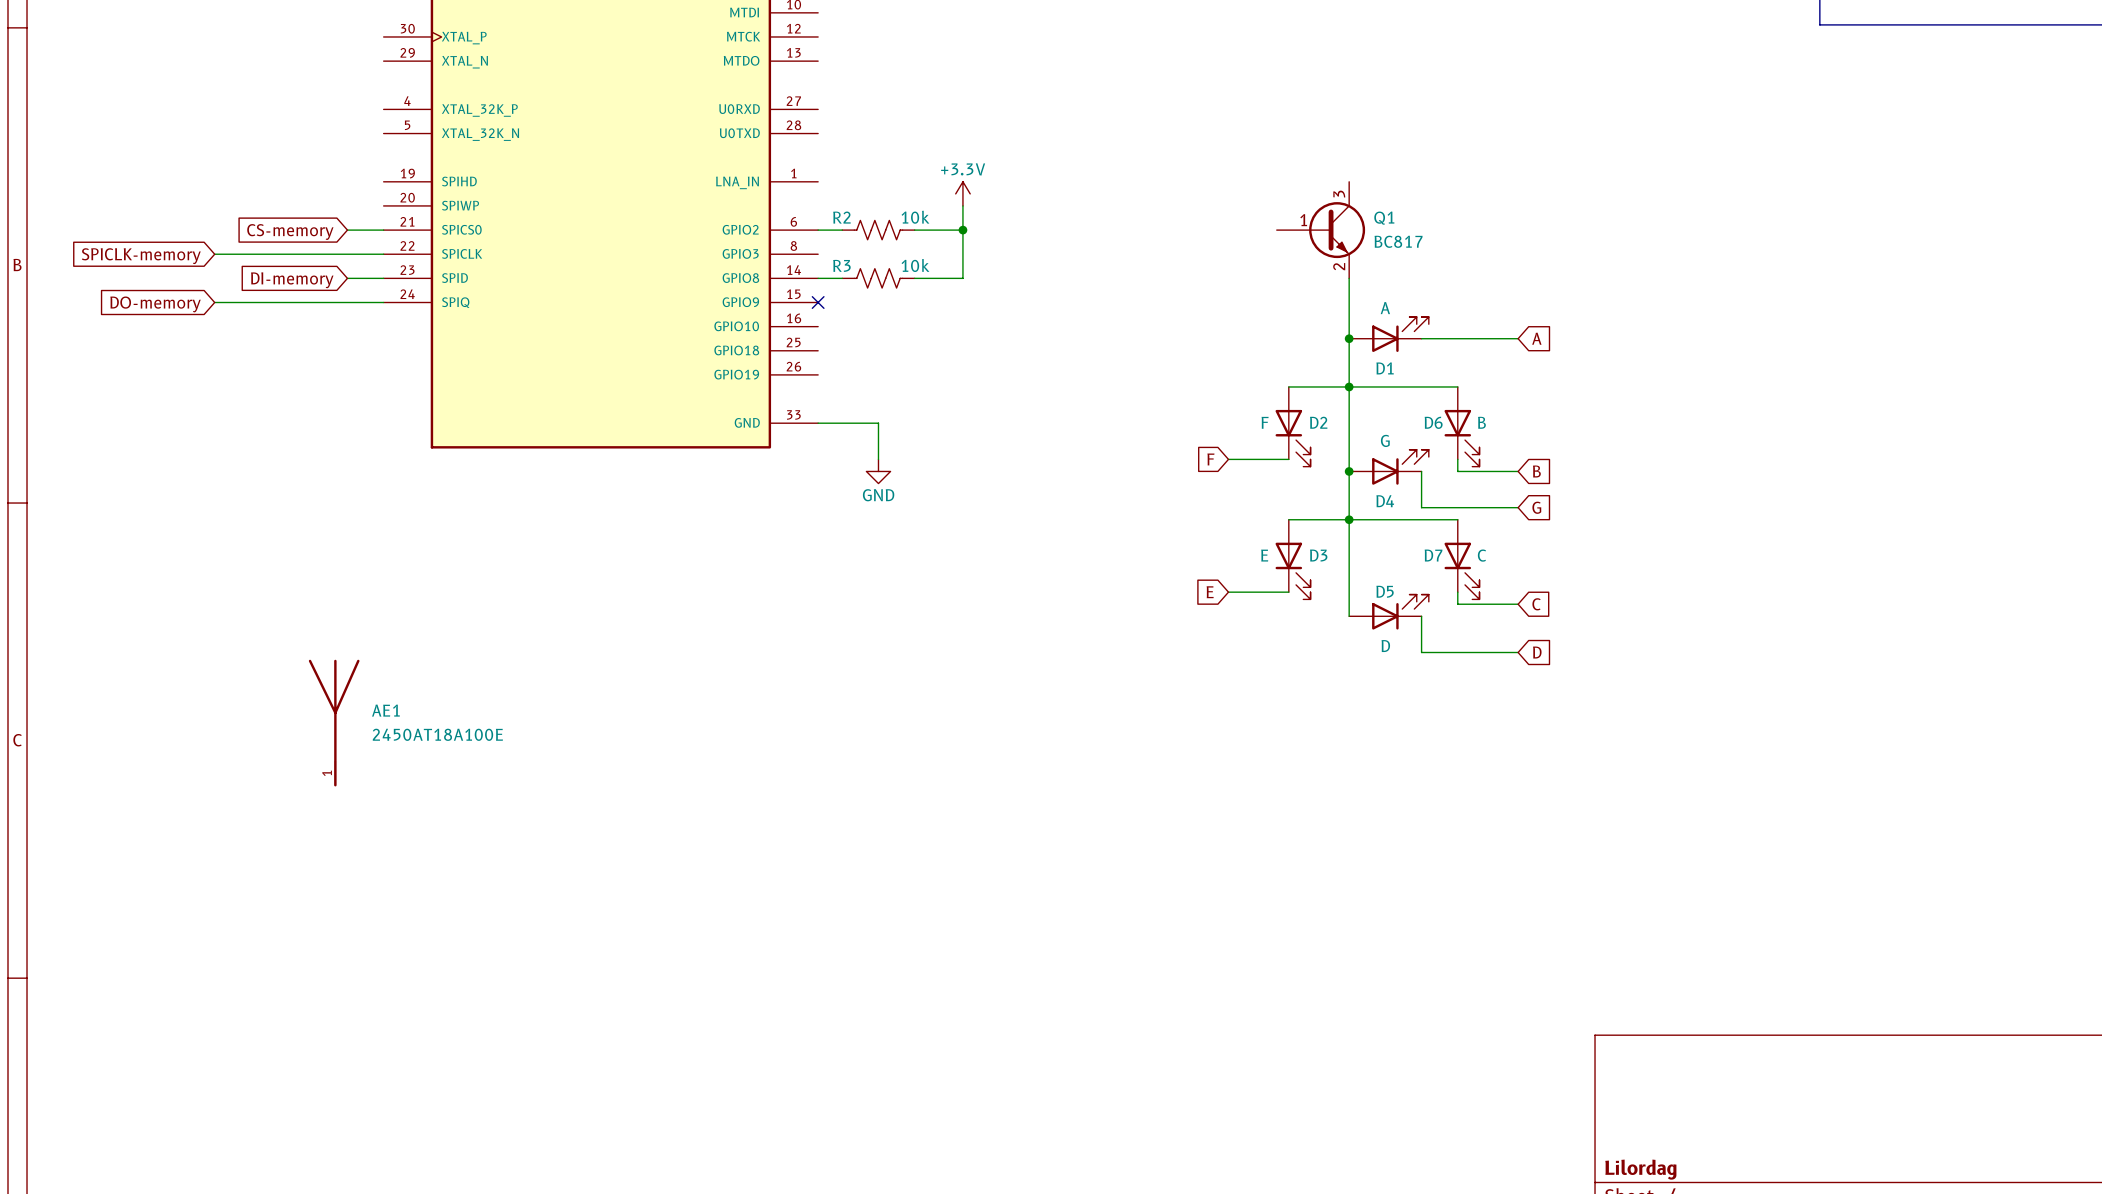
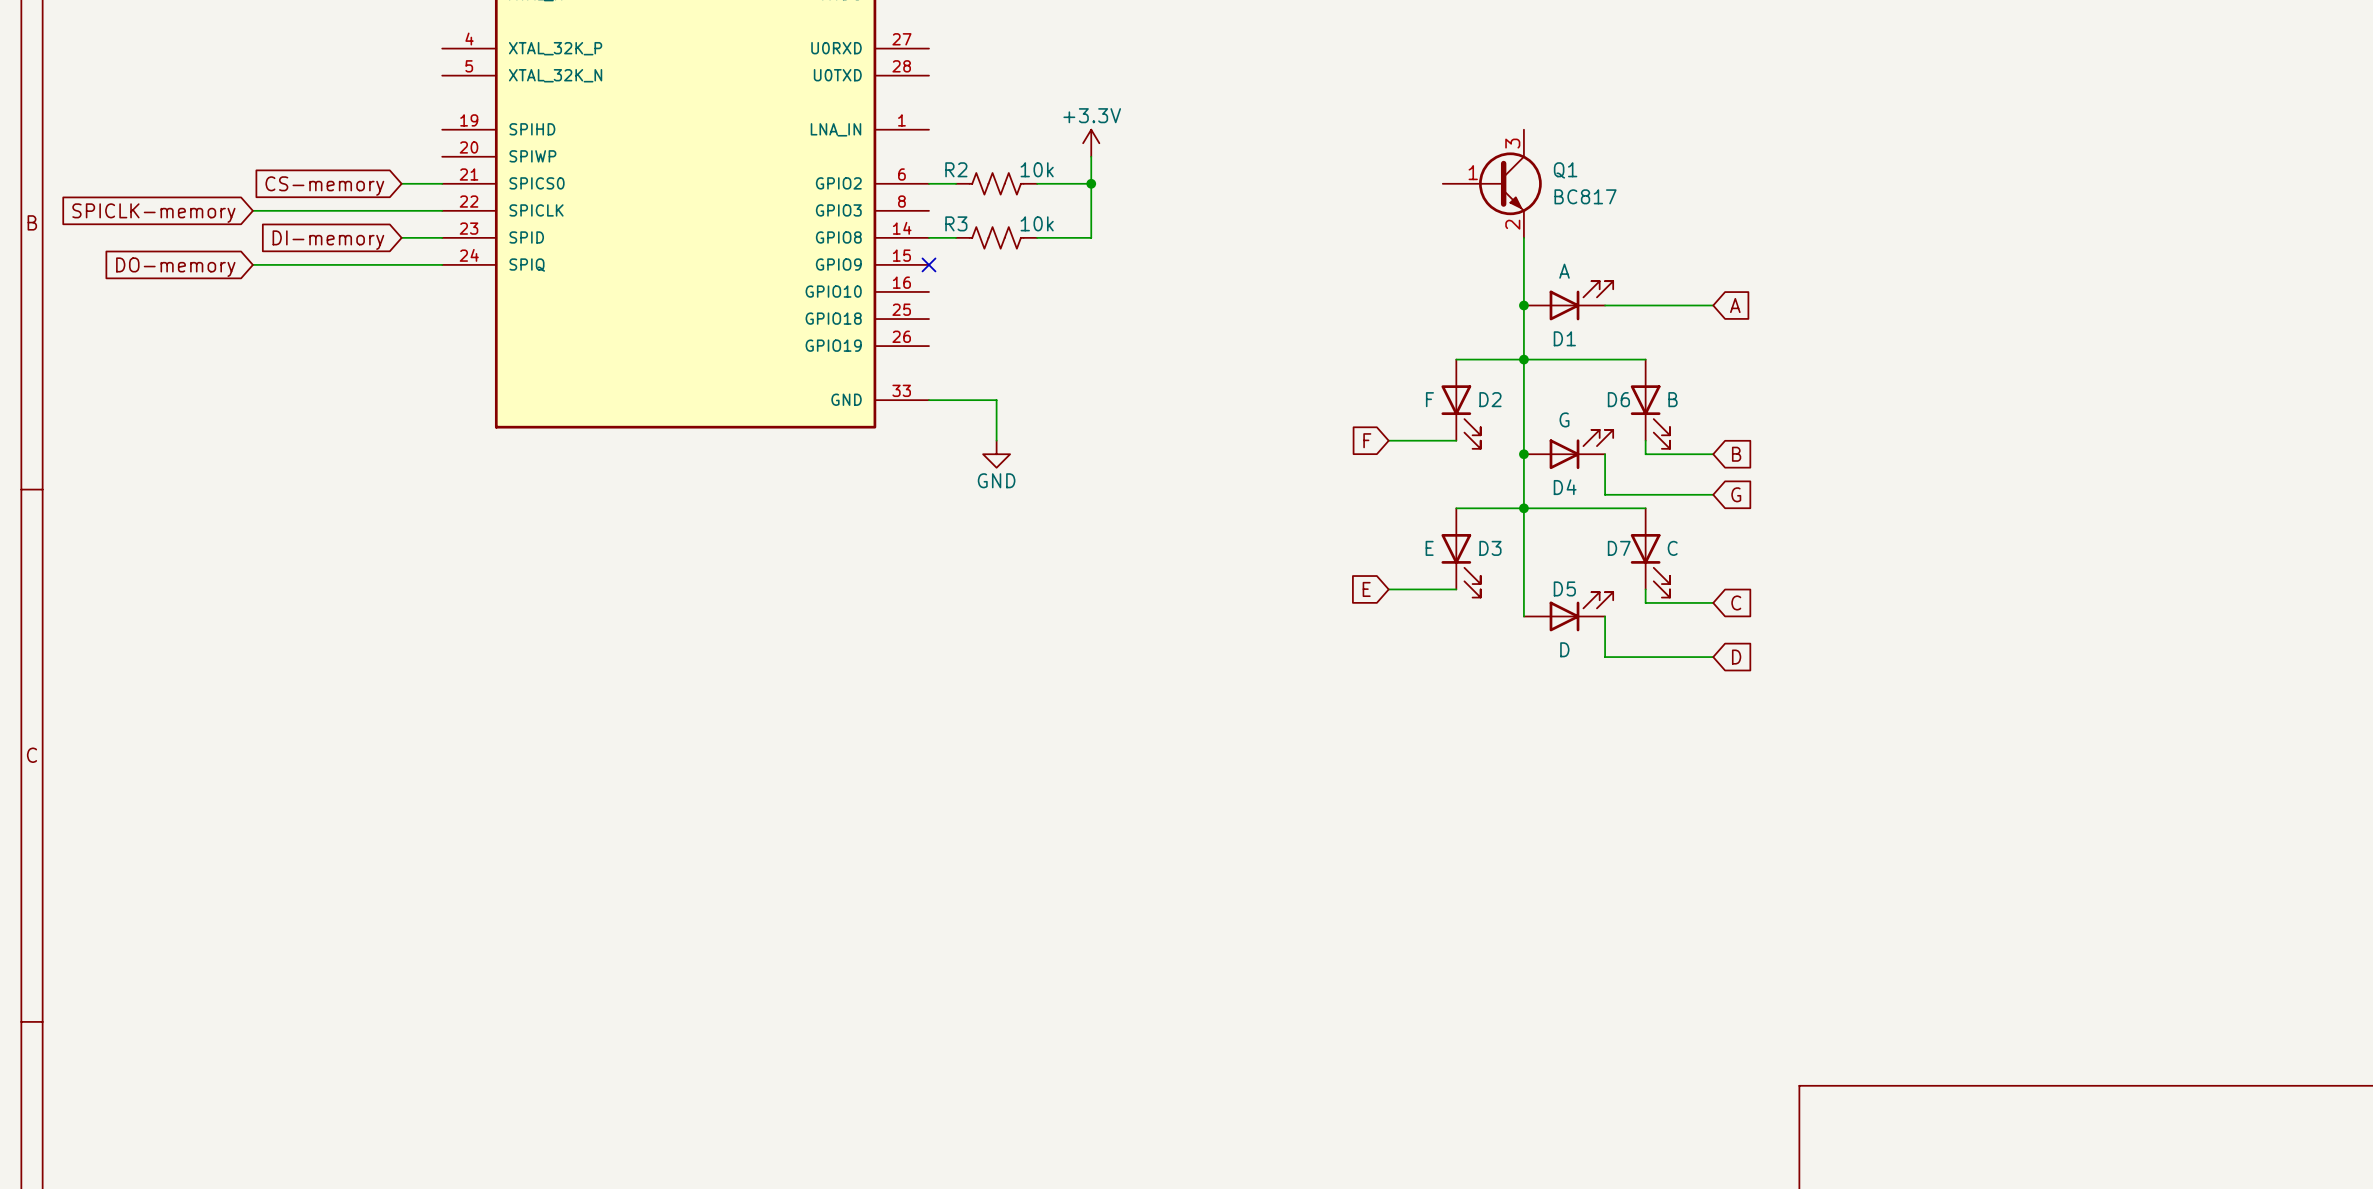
AE1: 2450AT18A100E (334, 723) -> none

